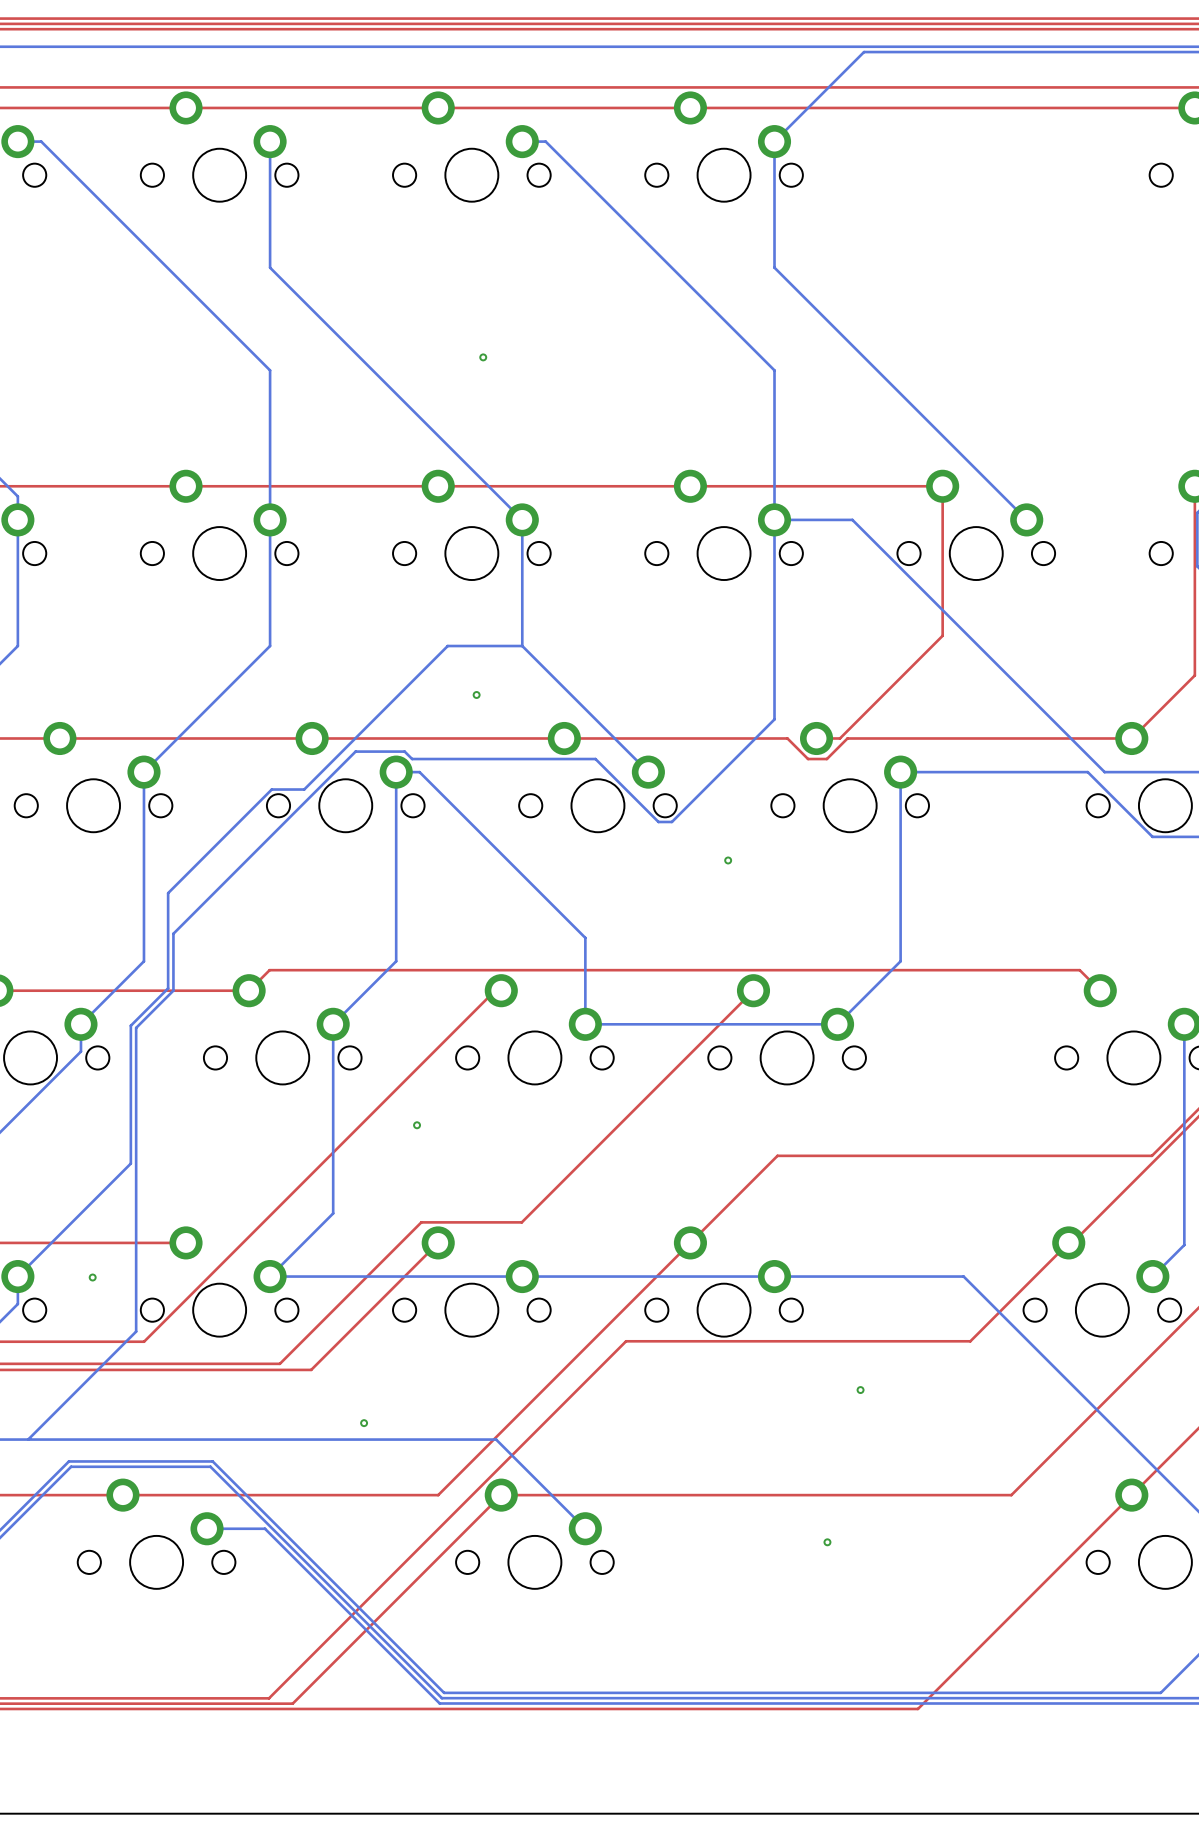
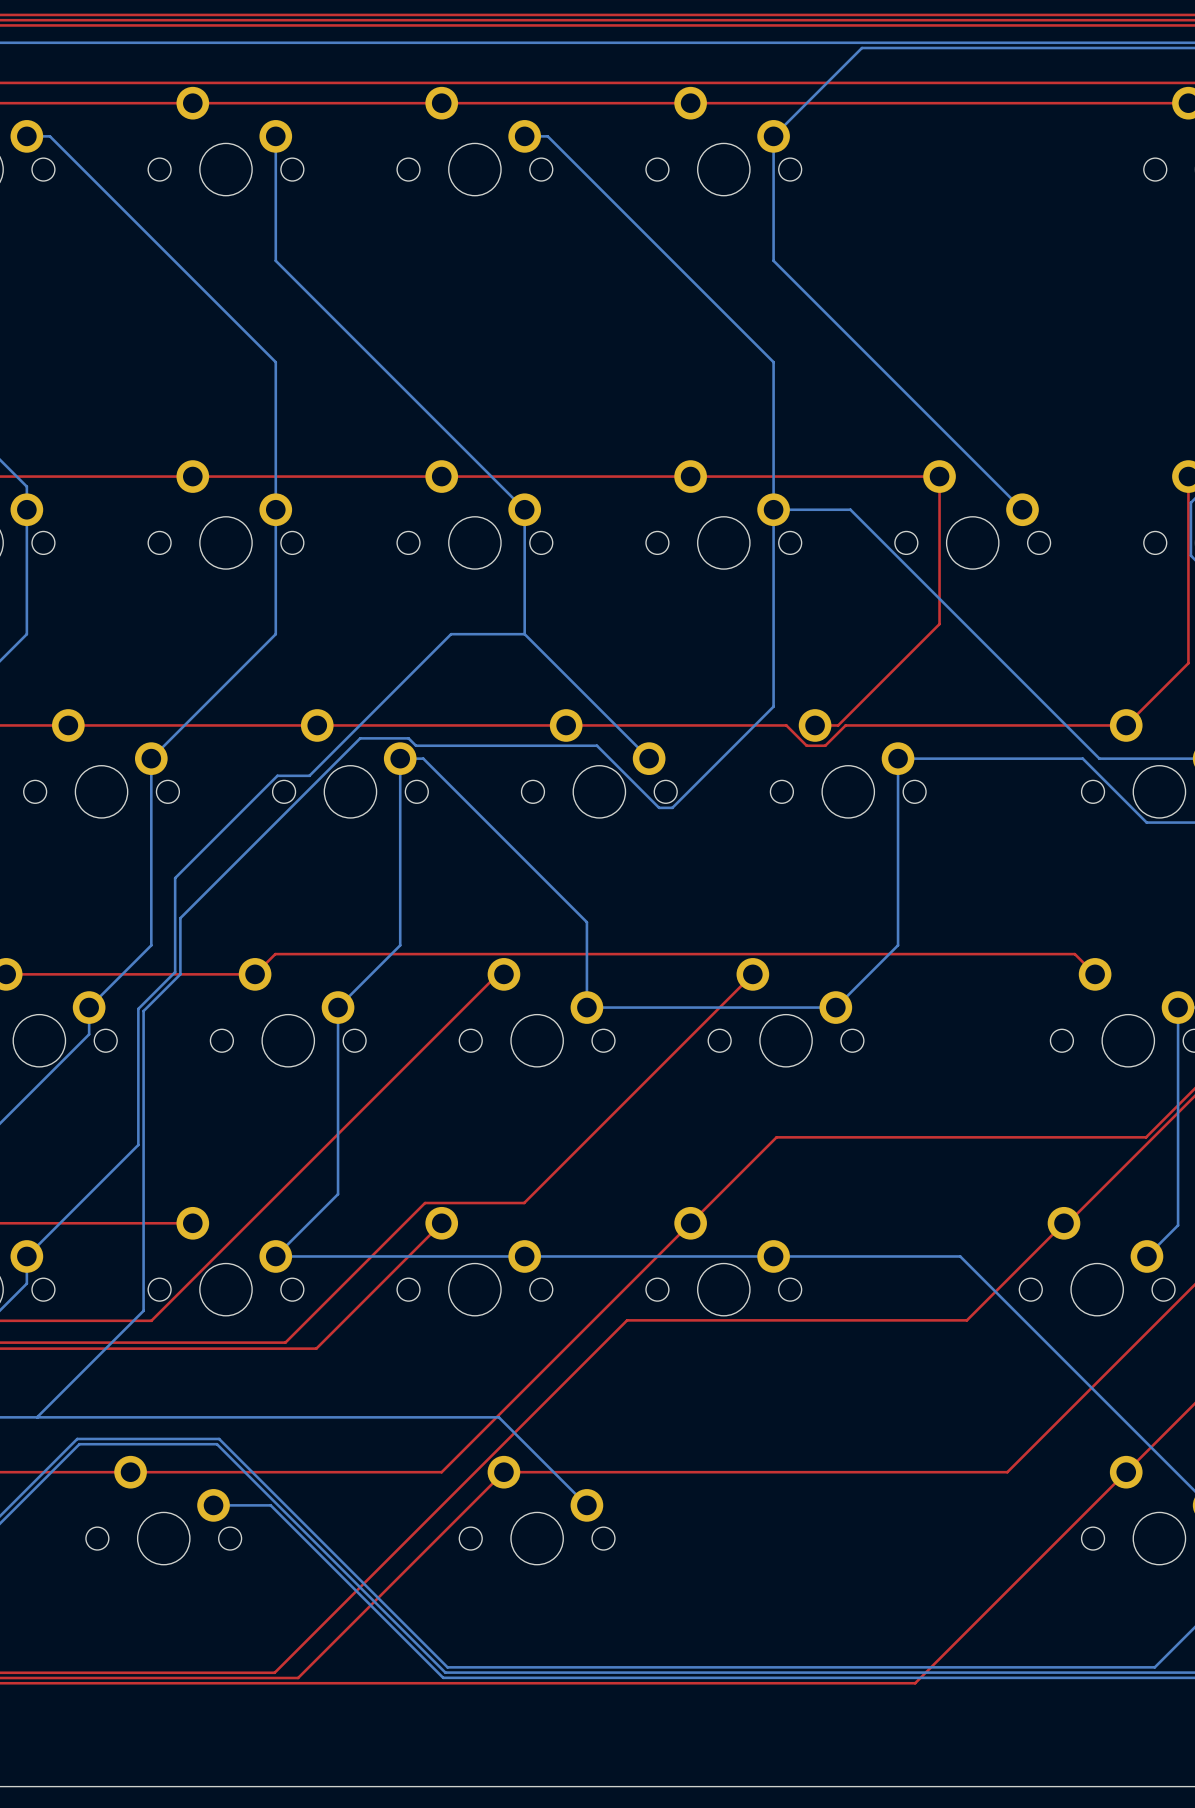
via: (483, 357) -> none
via: (476, 694) -> none
via: (728, 860) -> none
via: (417, 1125) -> none
via: (92, 1277) -> none
via: (860, 1390) -> none
via: (364, 1423) -> none
via: (827, 1542) -> none

